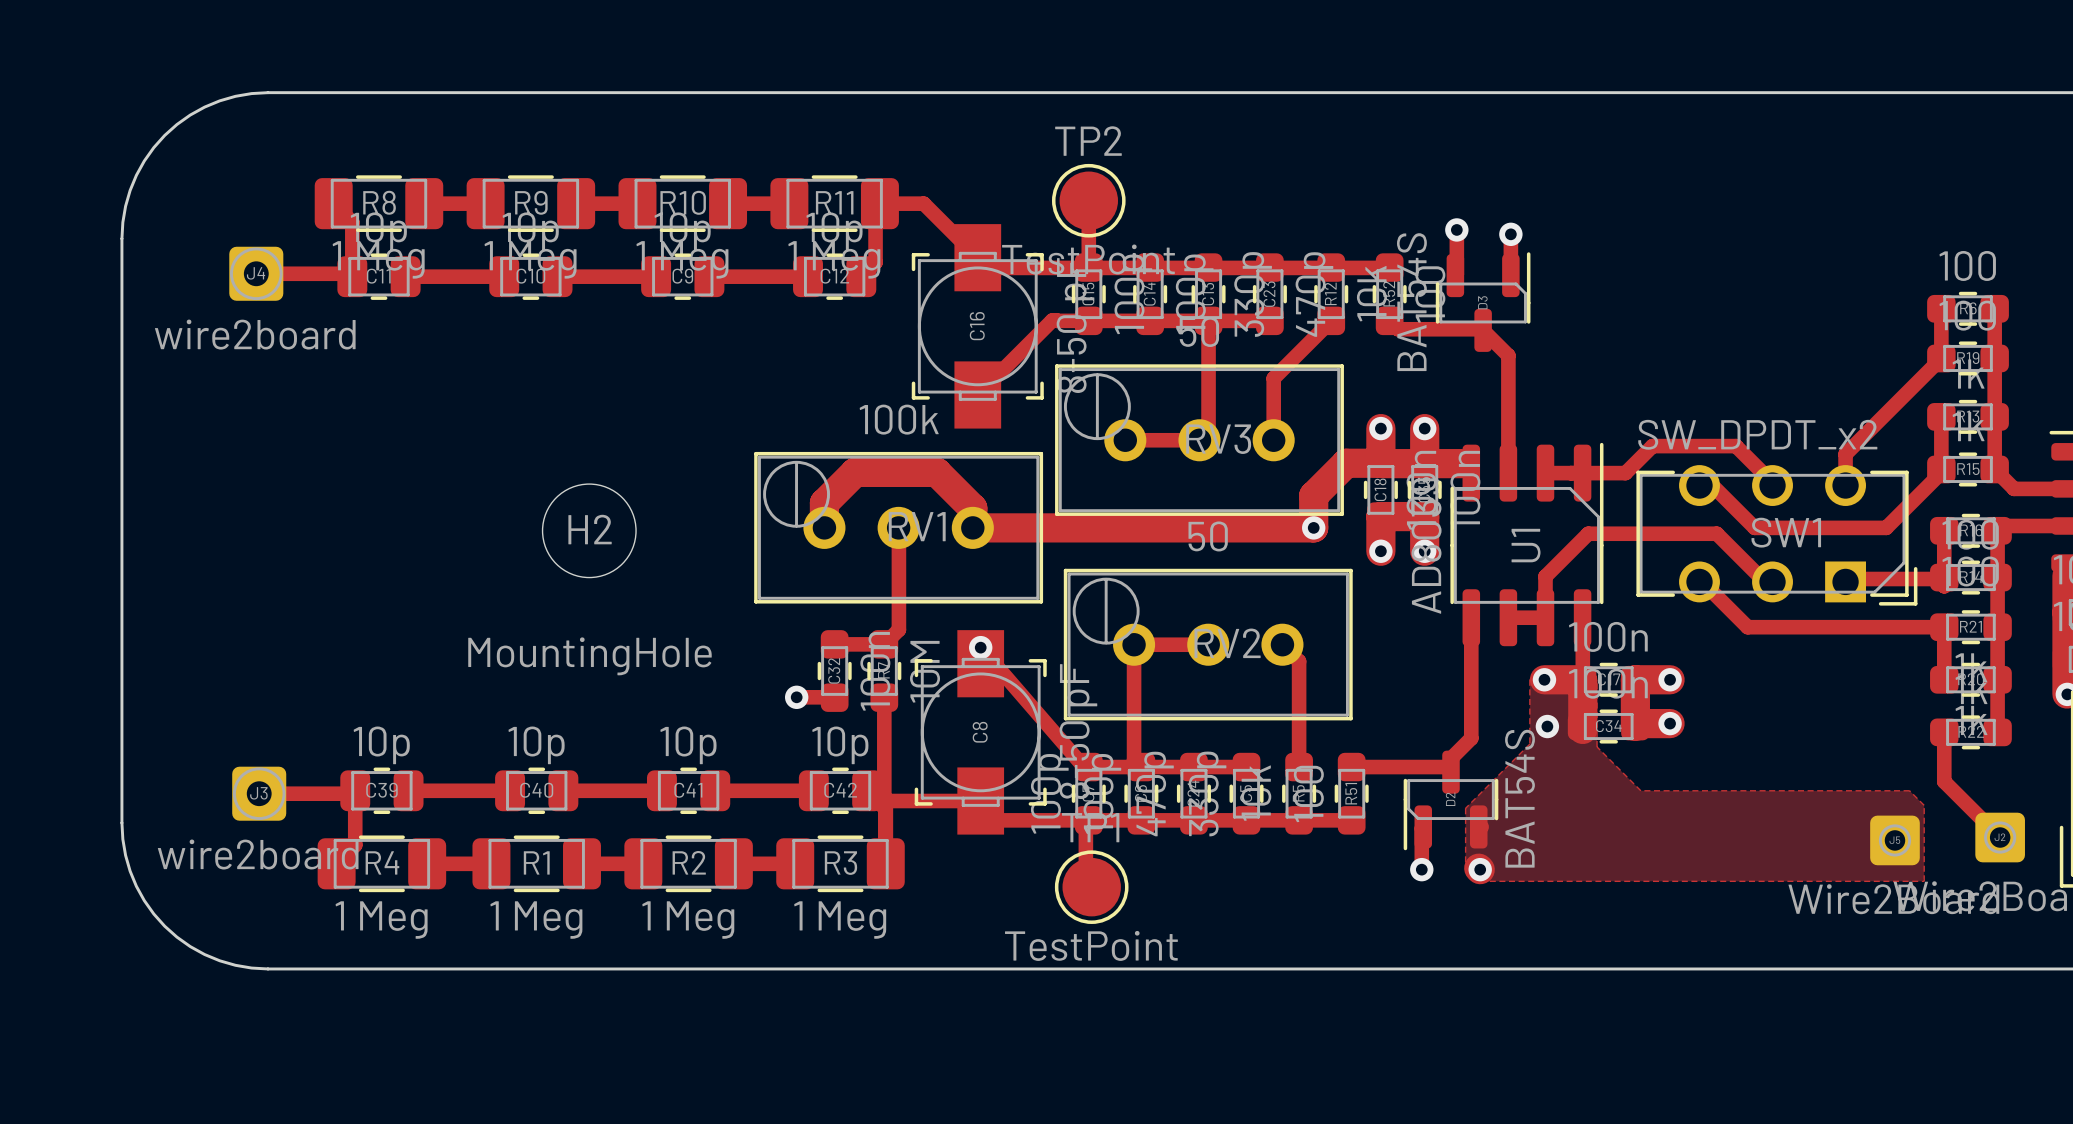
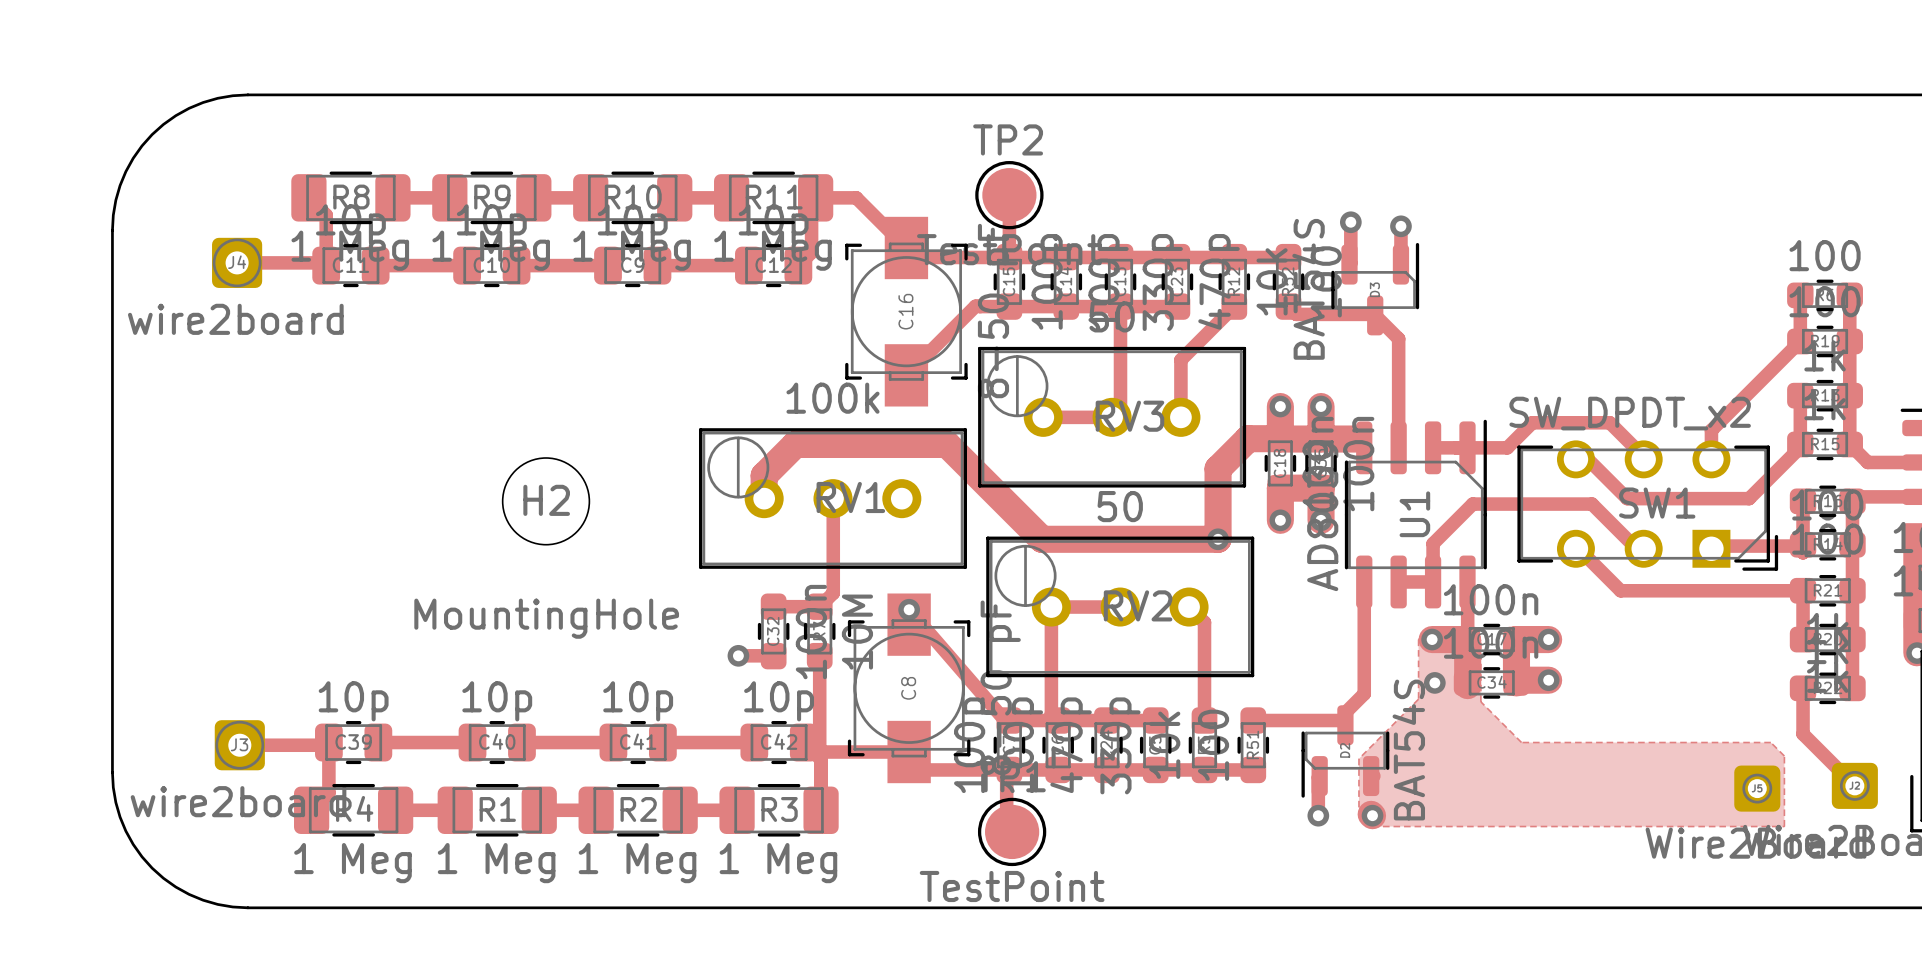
track: (855, 472) (936, 472) (972, 508) (972, 527) (1313, 527) -> (792, 447) (795, 444) (947, 444) (1041, 539) (1218, 539) (1218, 498)
via position: (1313, 527) -> (1218, 539)

